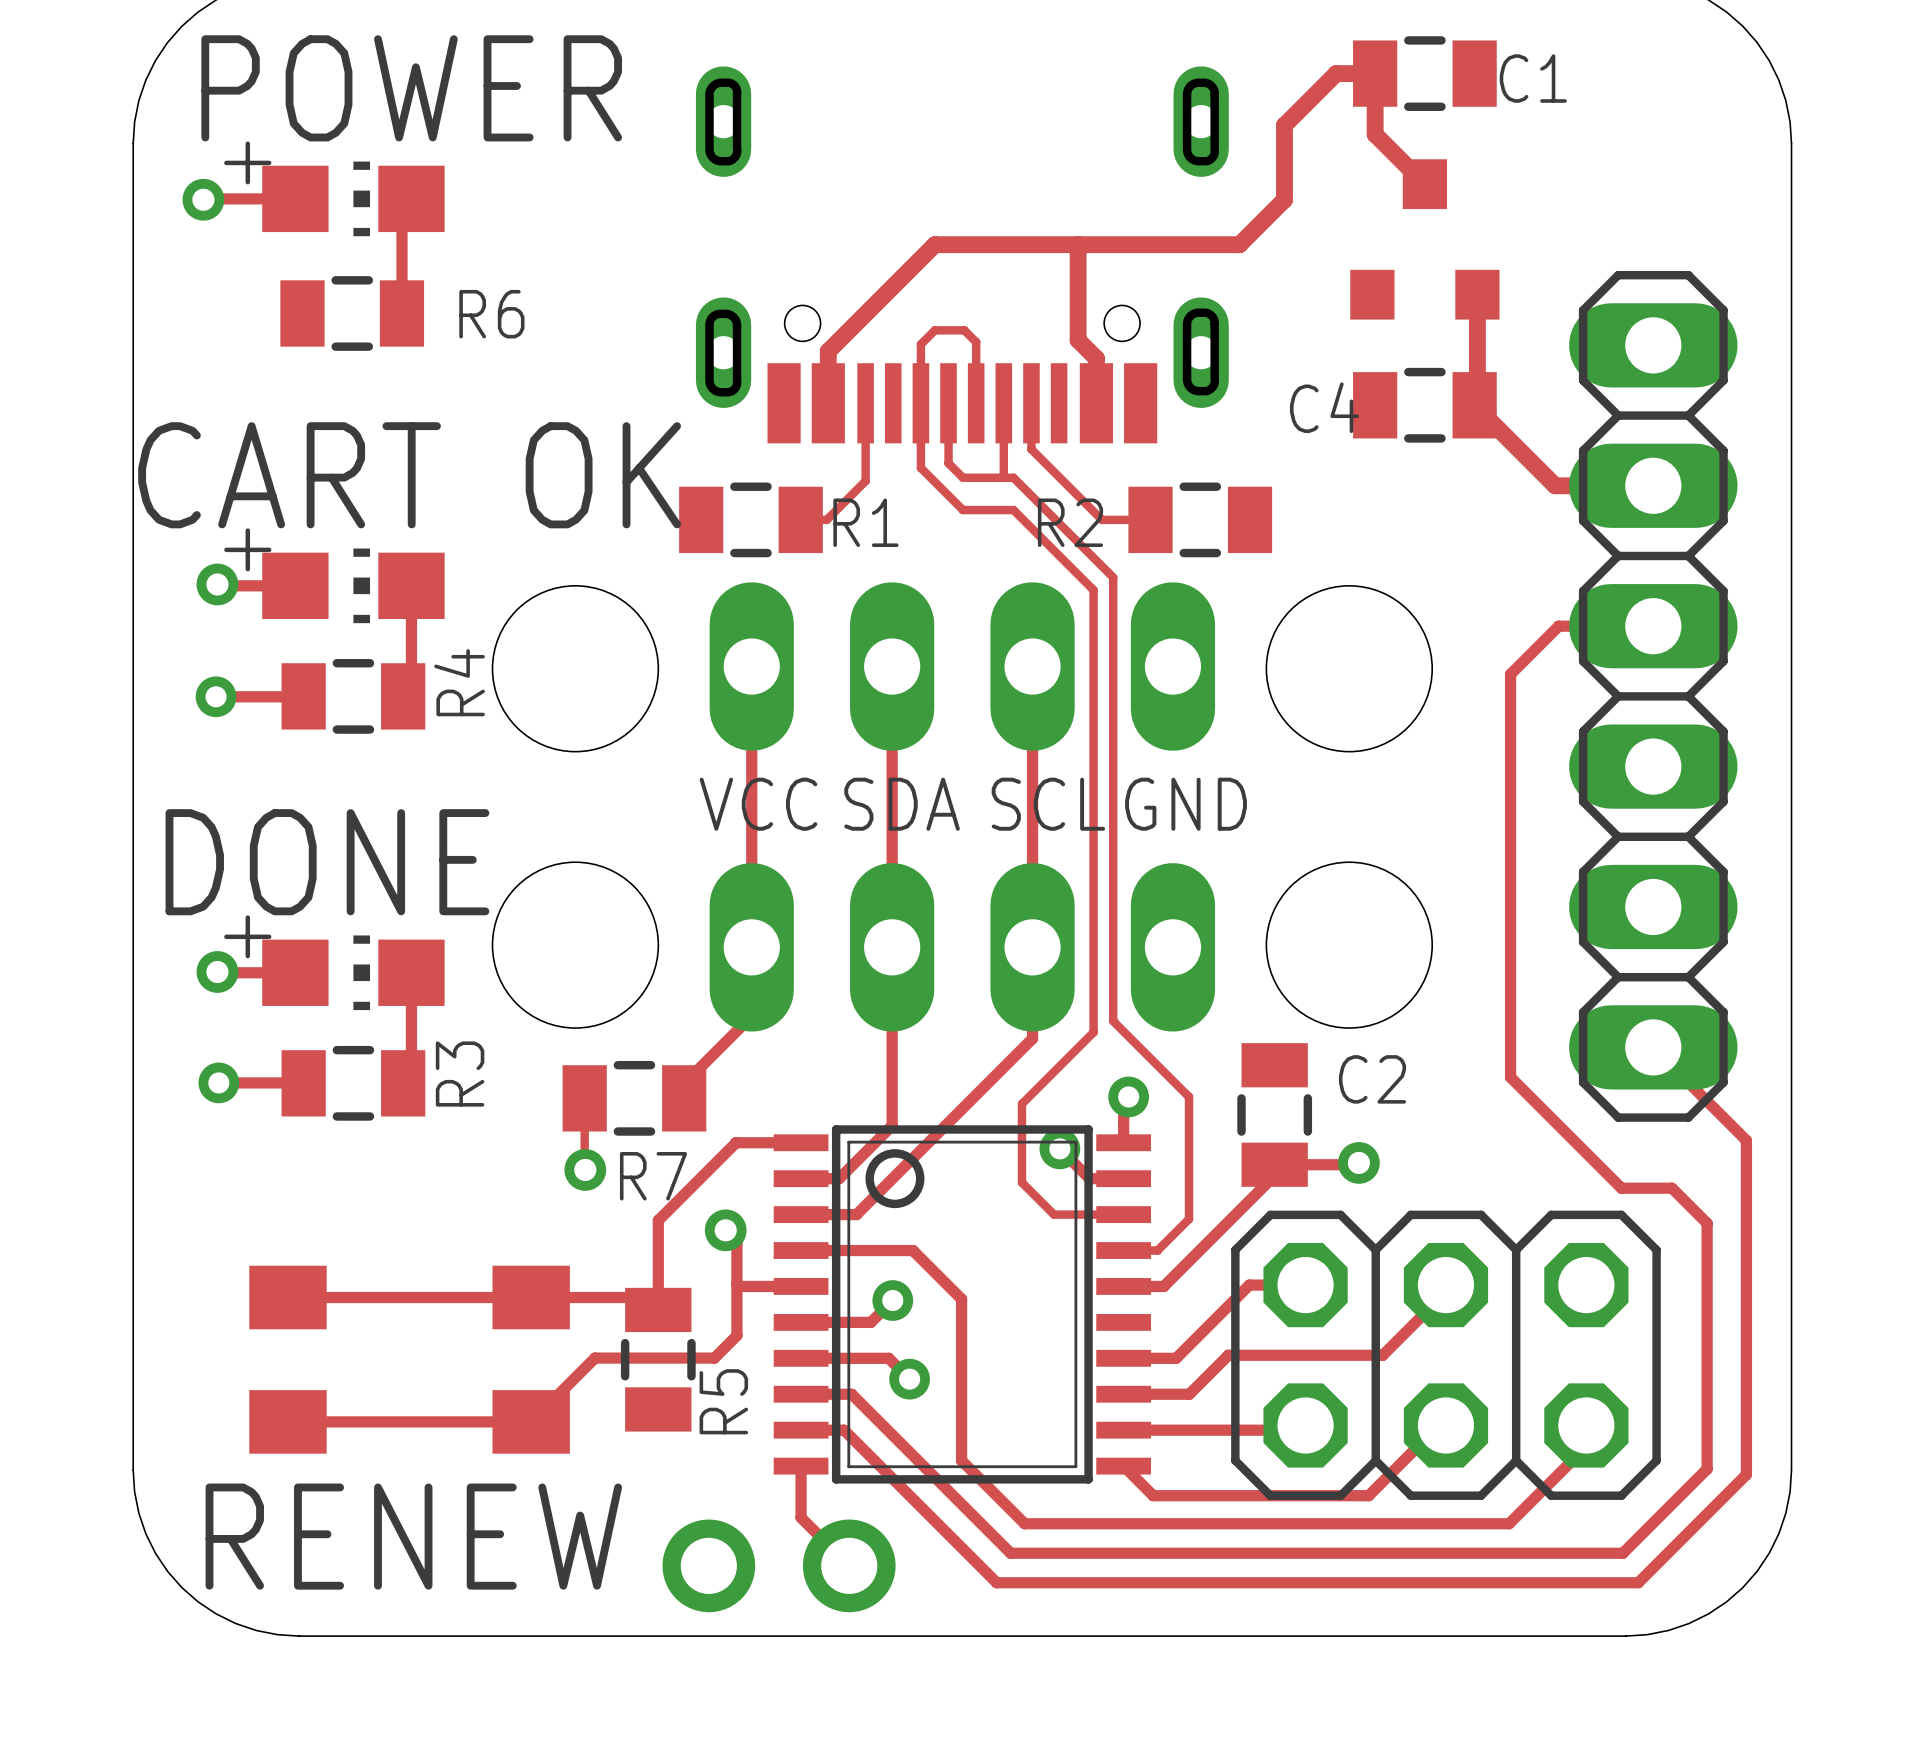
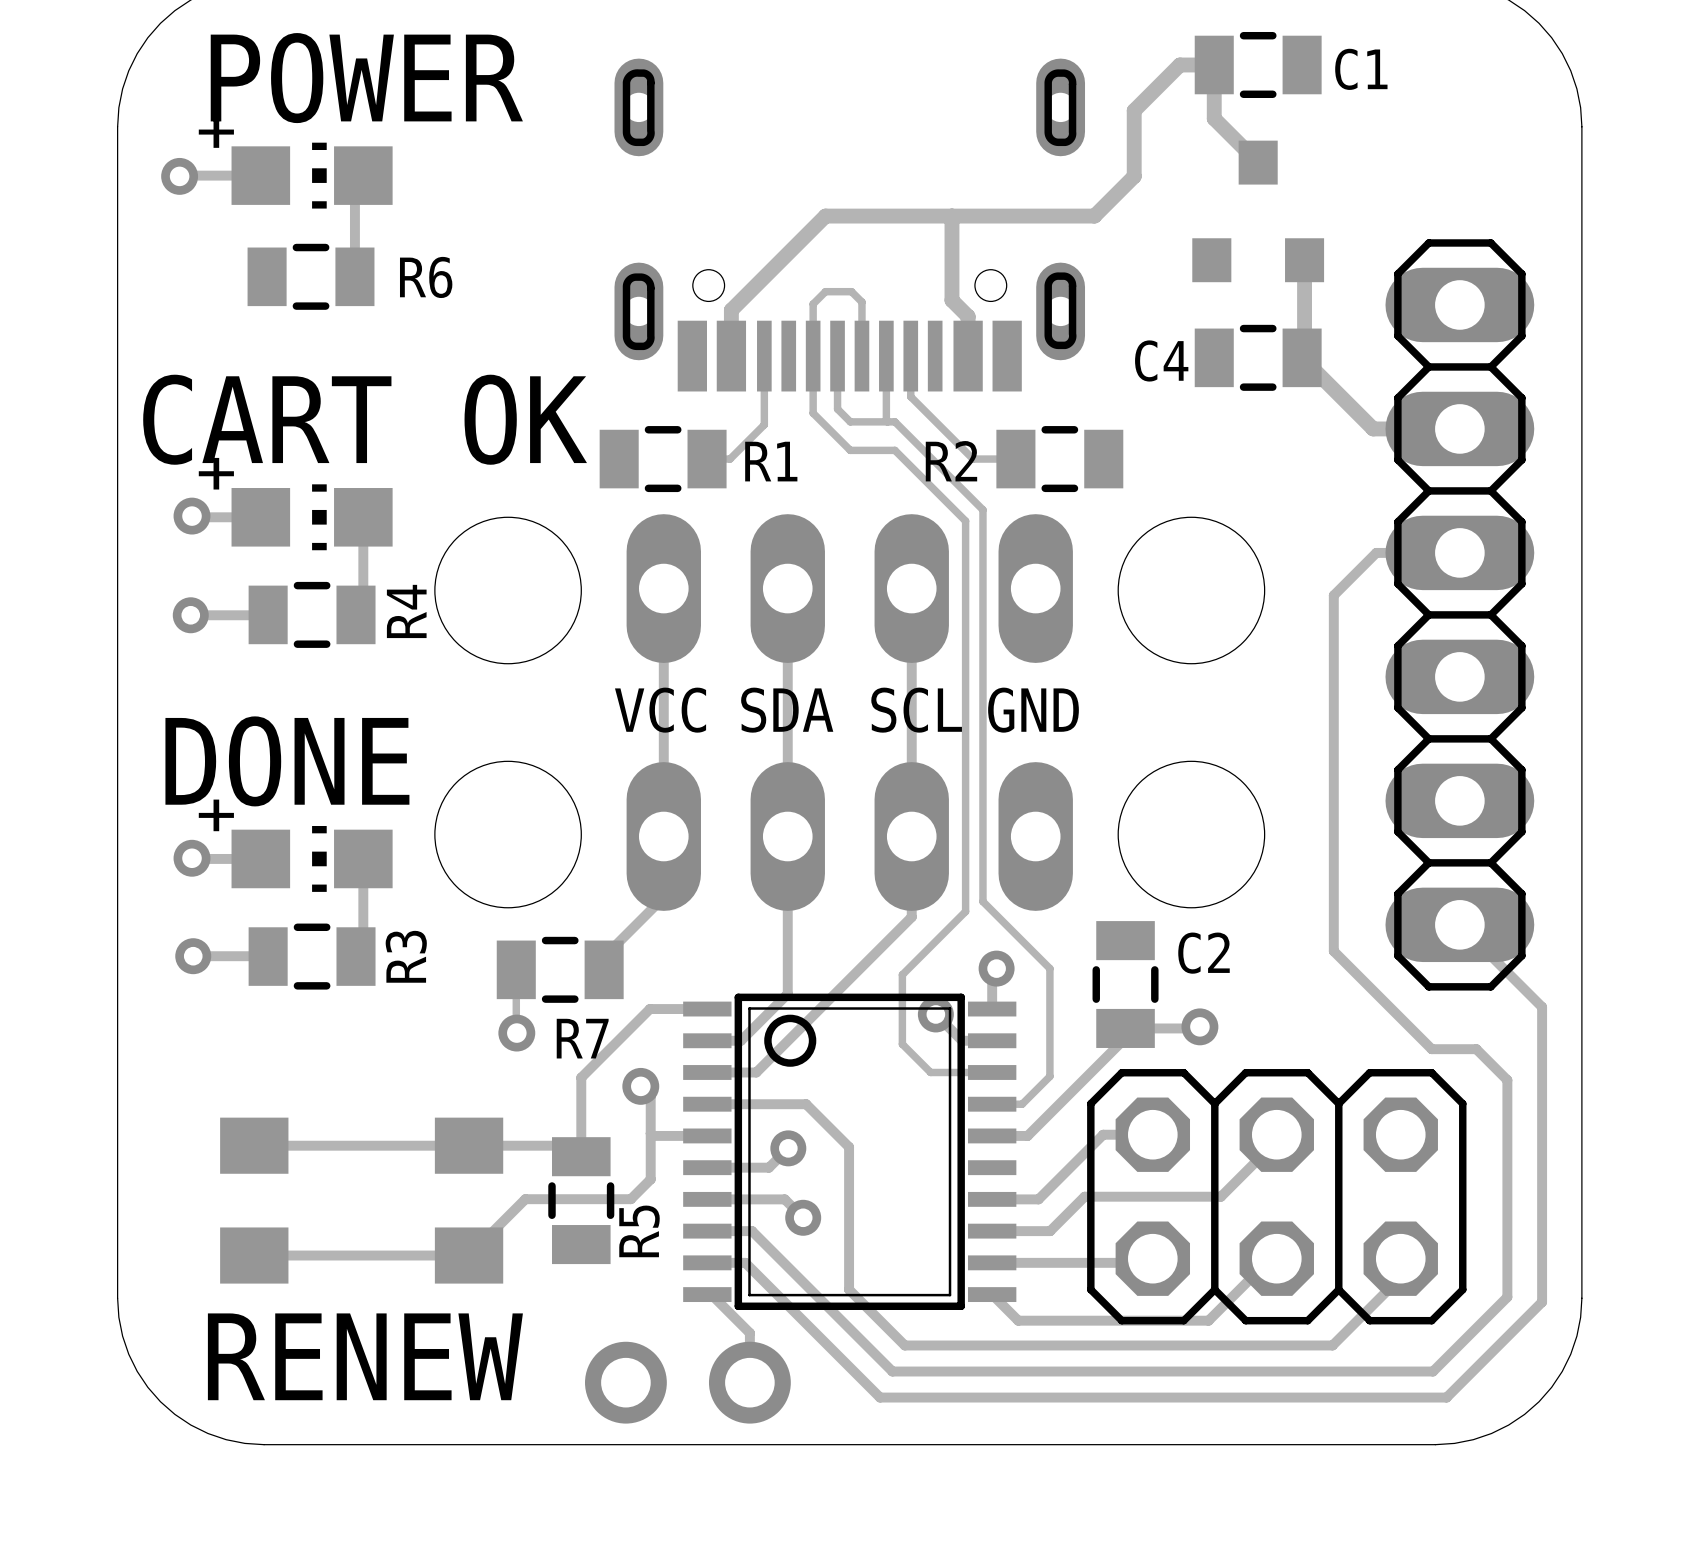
track: (801, 1466) (801, 1517) (849, 1565) -> (707, 1294) (711, 1294) (749, 1333) (749, 1382)

